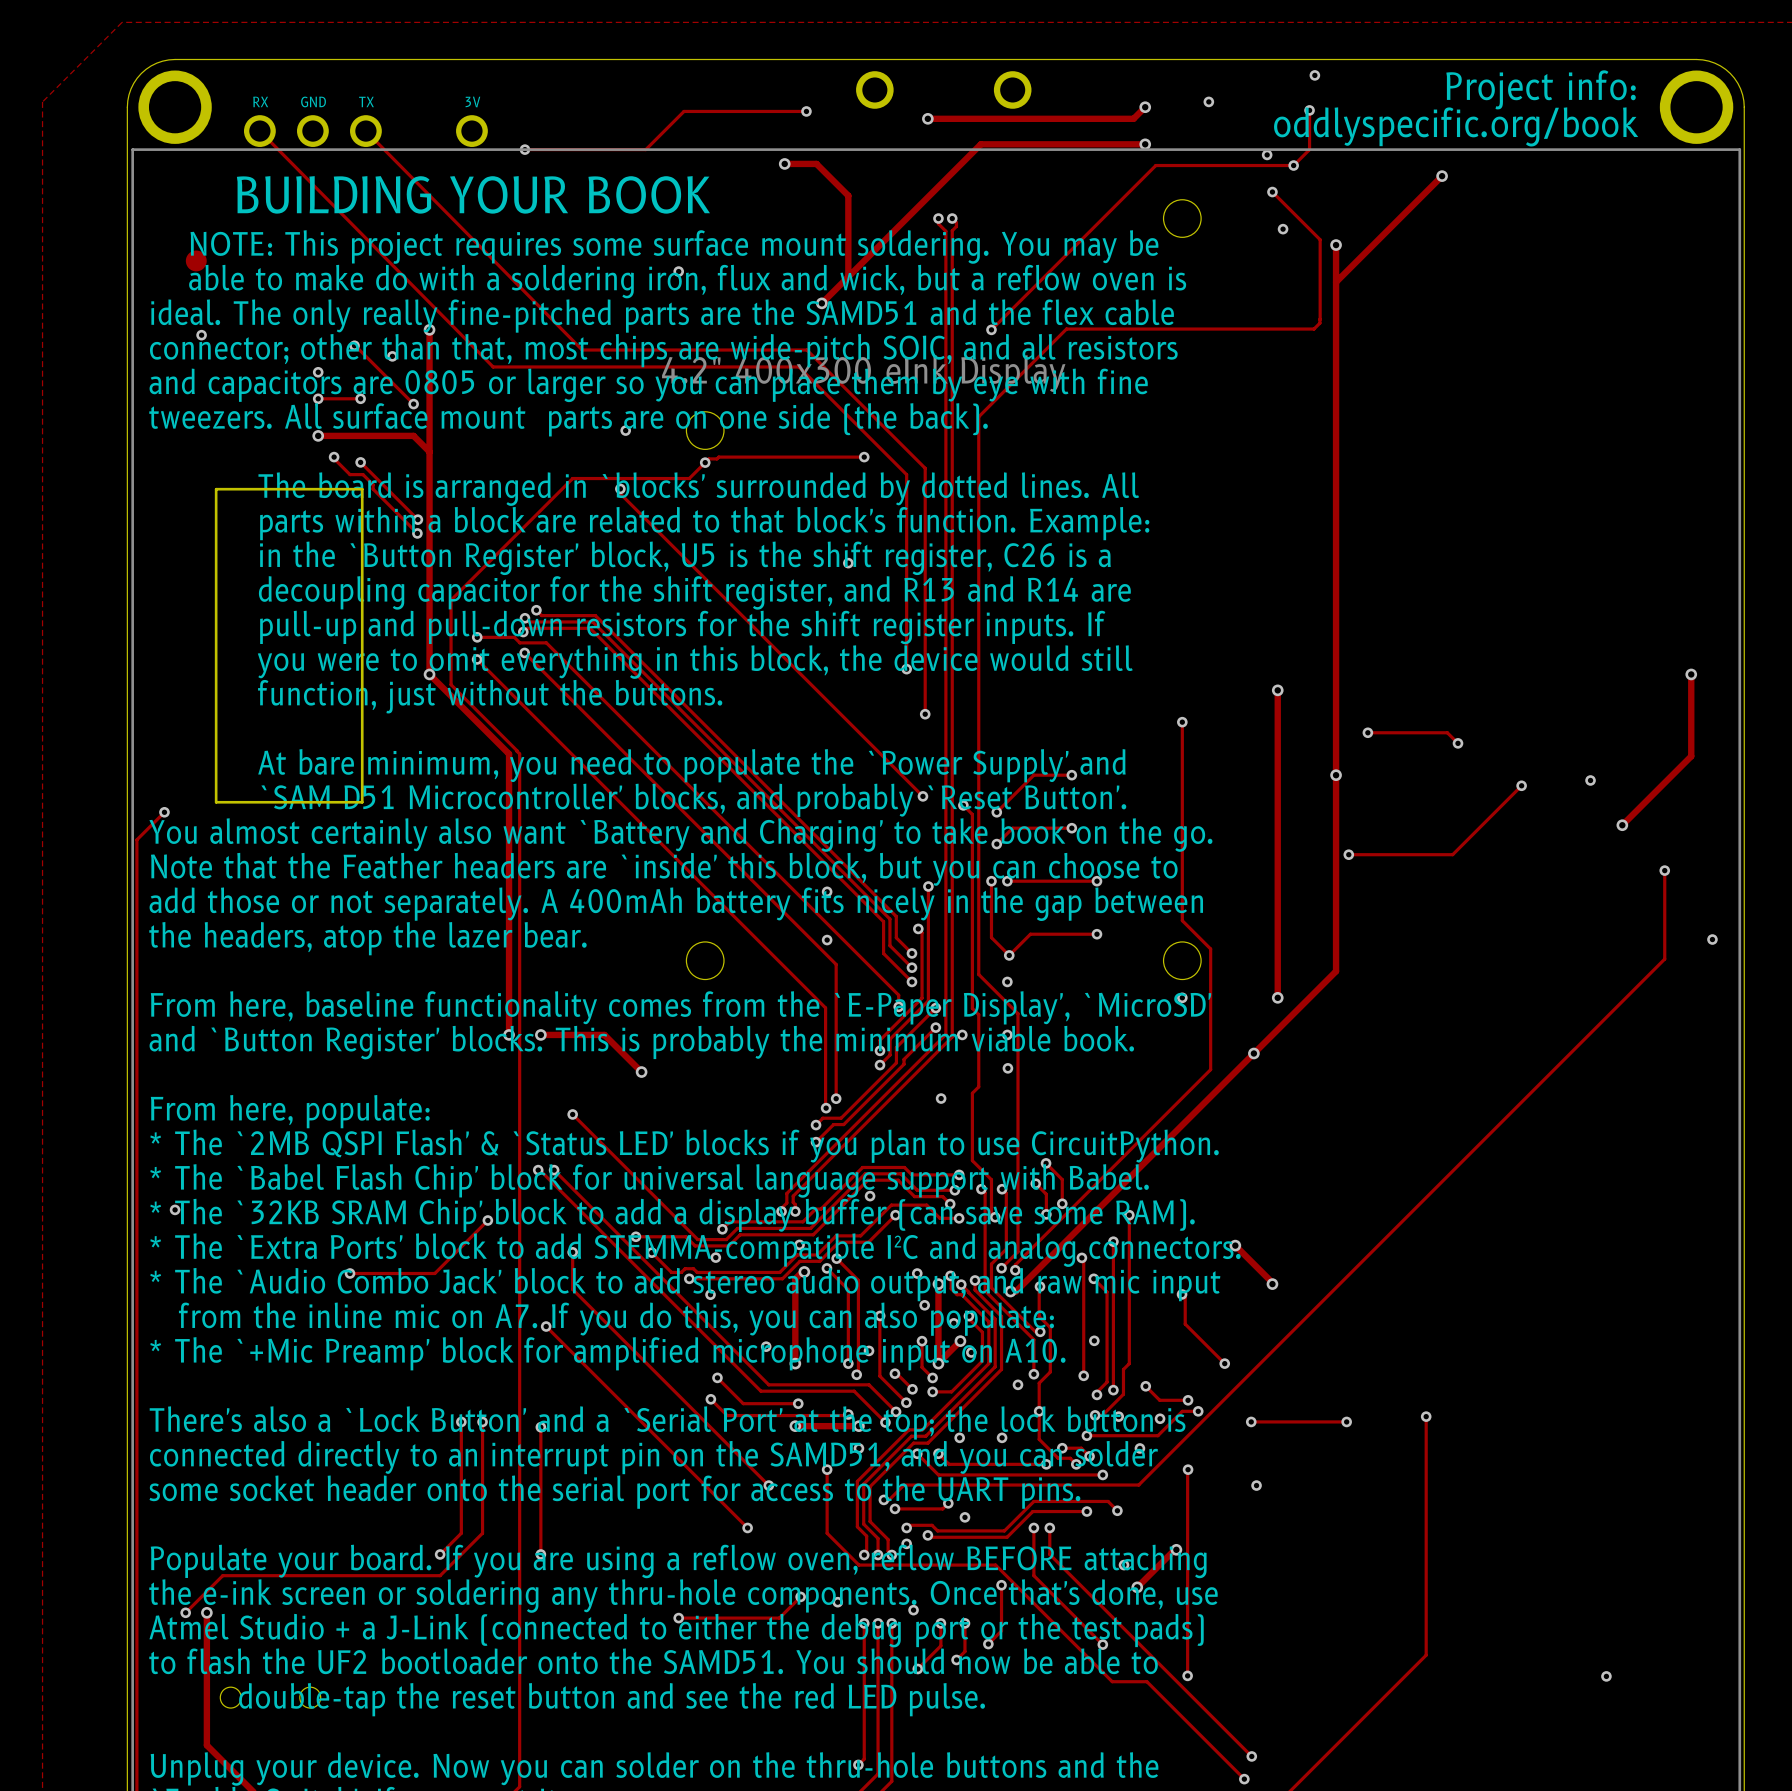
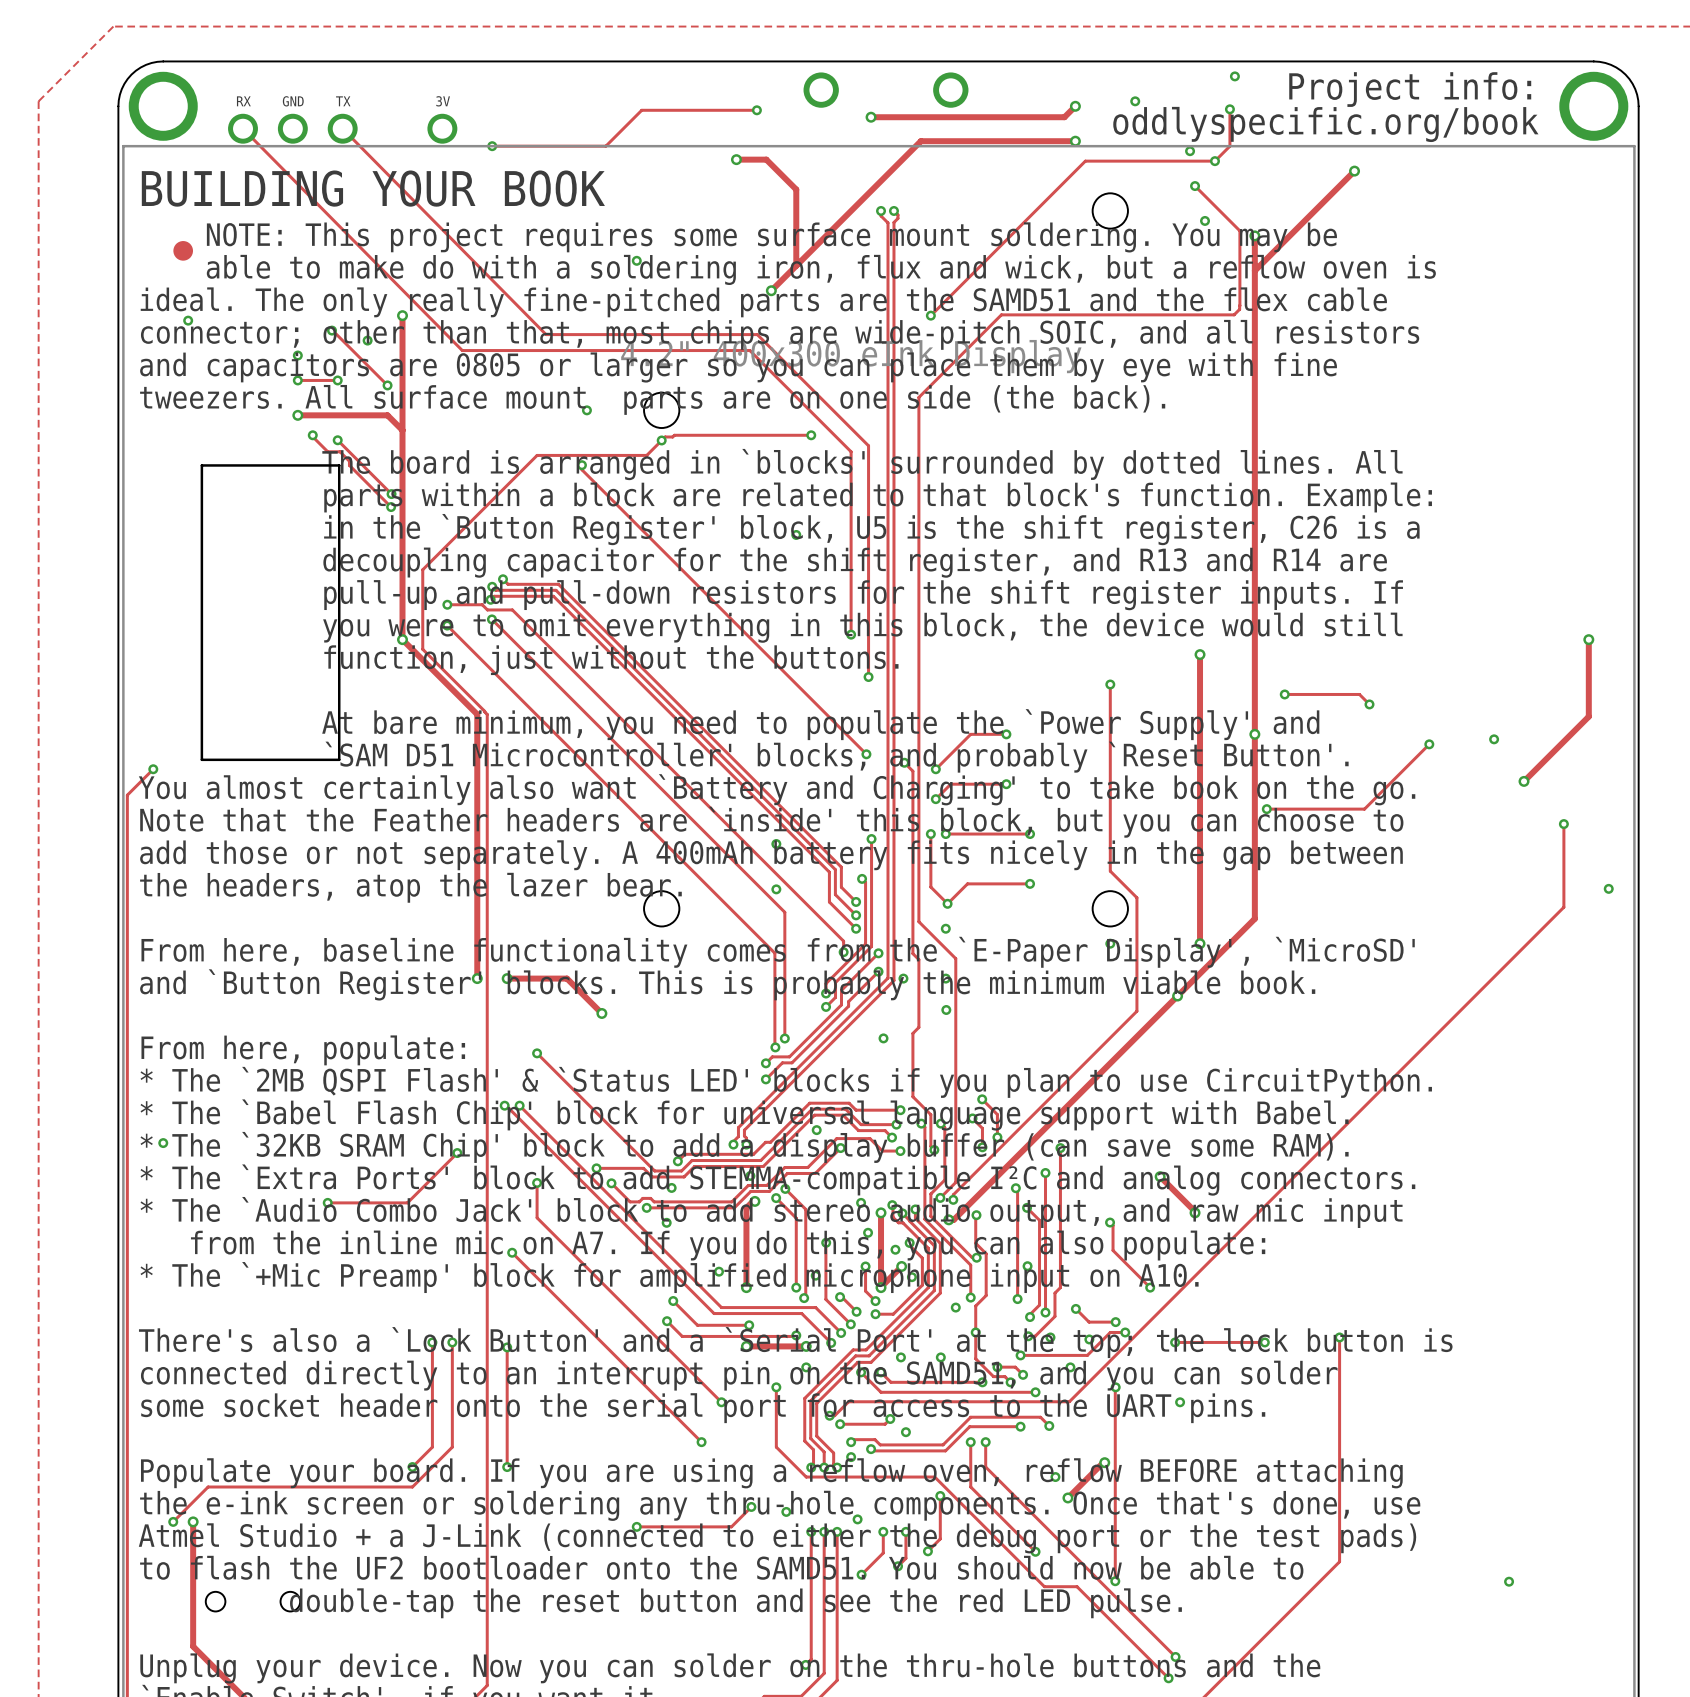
text position: BUILDING YOUR BOOK (473, 194) -> BUILDING YOUR BOOK (373, 188)

